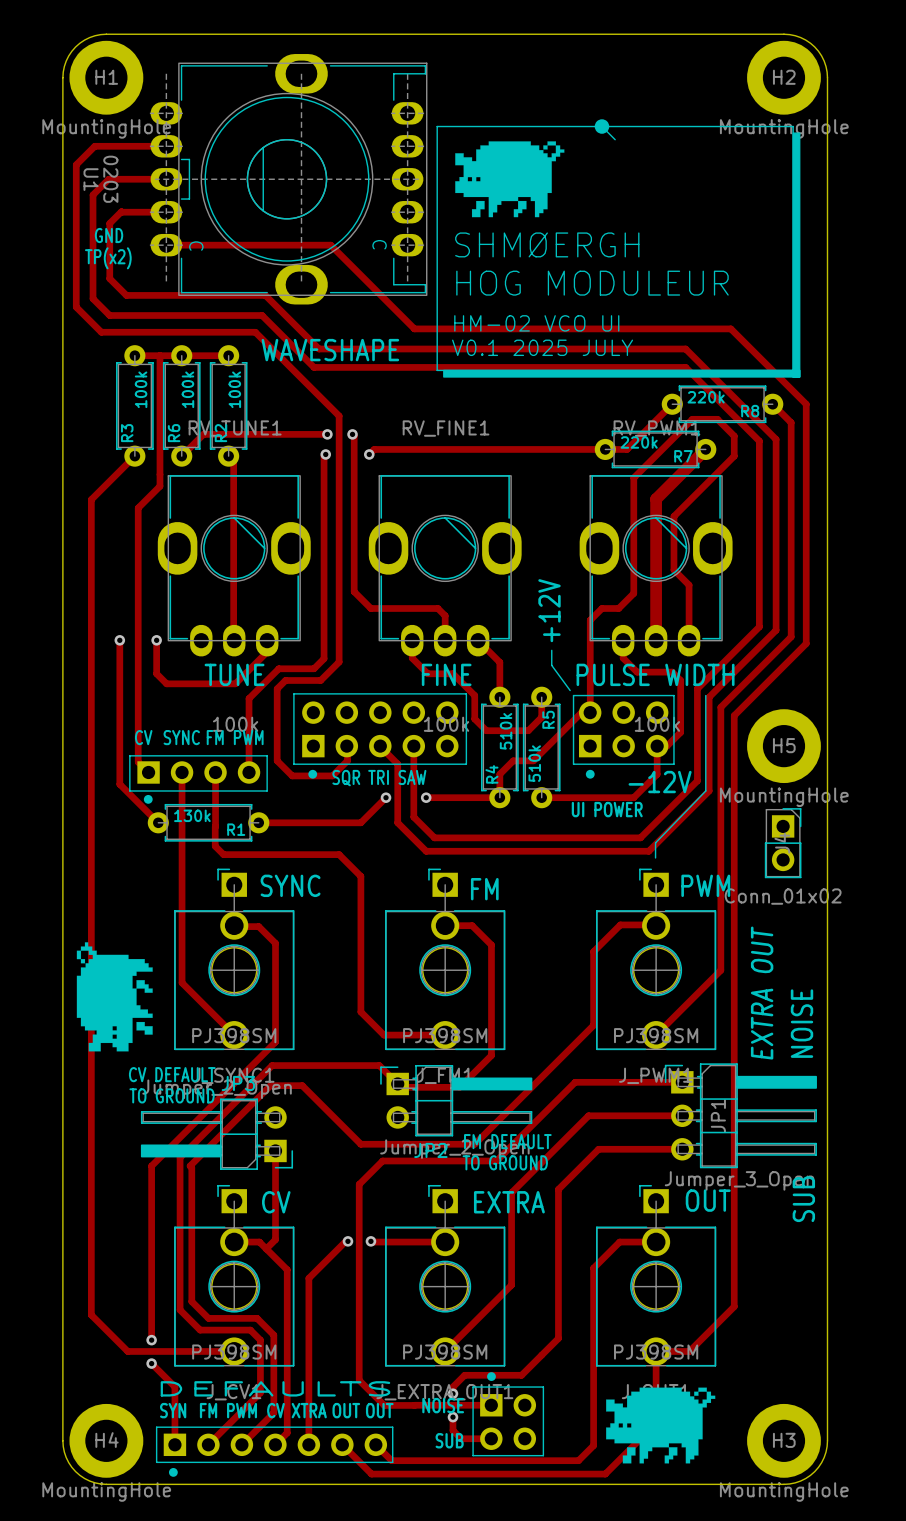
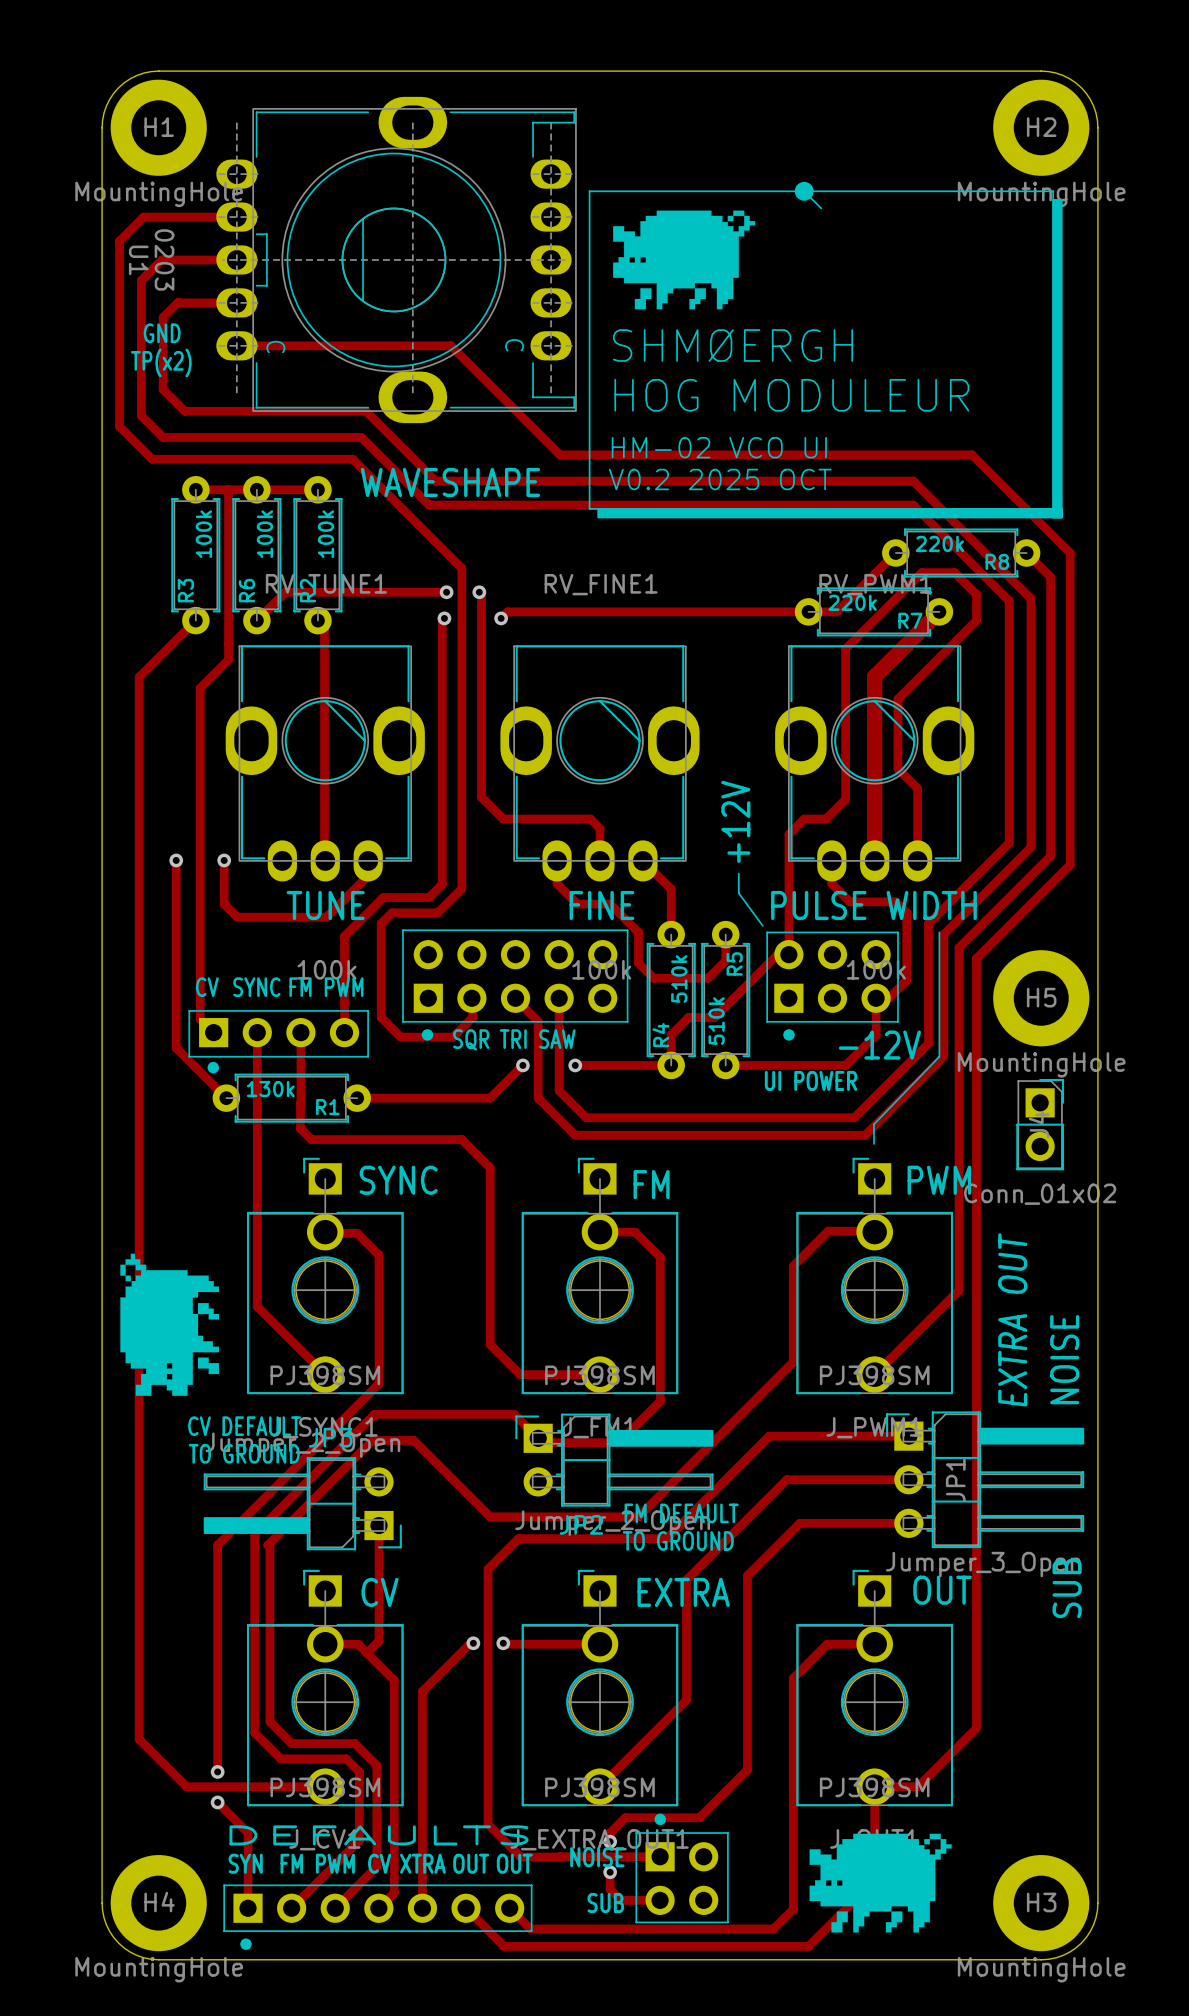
text: V0.1 2025 JULY (542, 347) -> V0.2 2025 OCT (720, 479)

